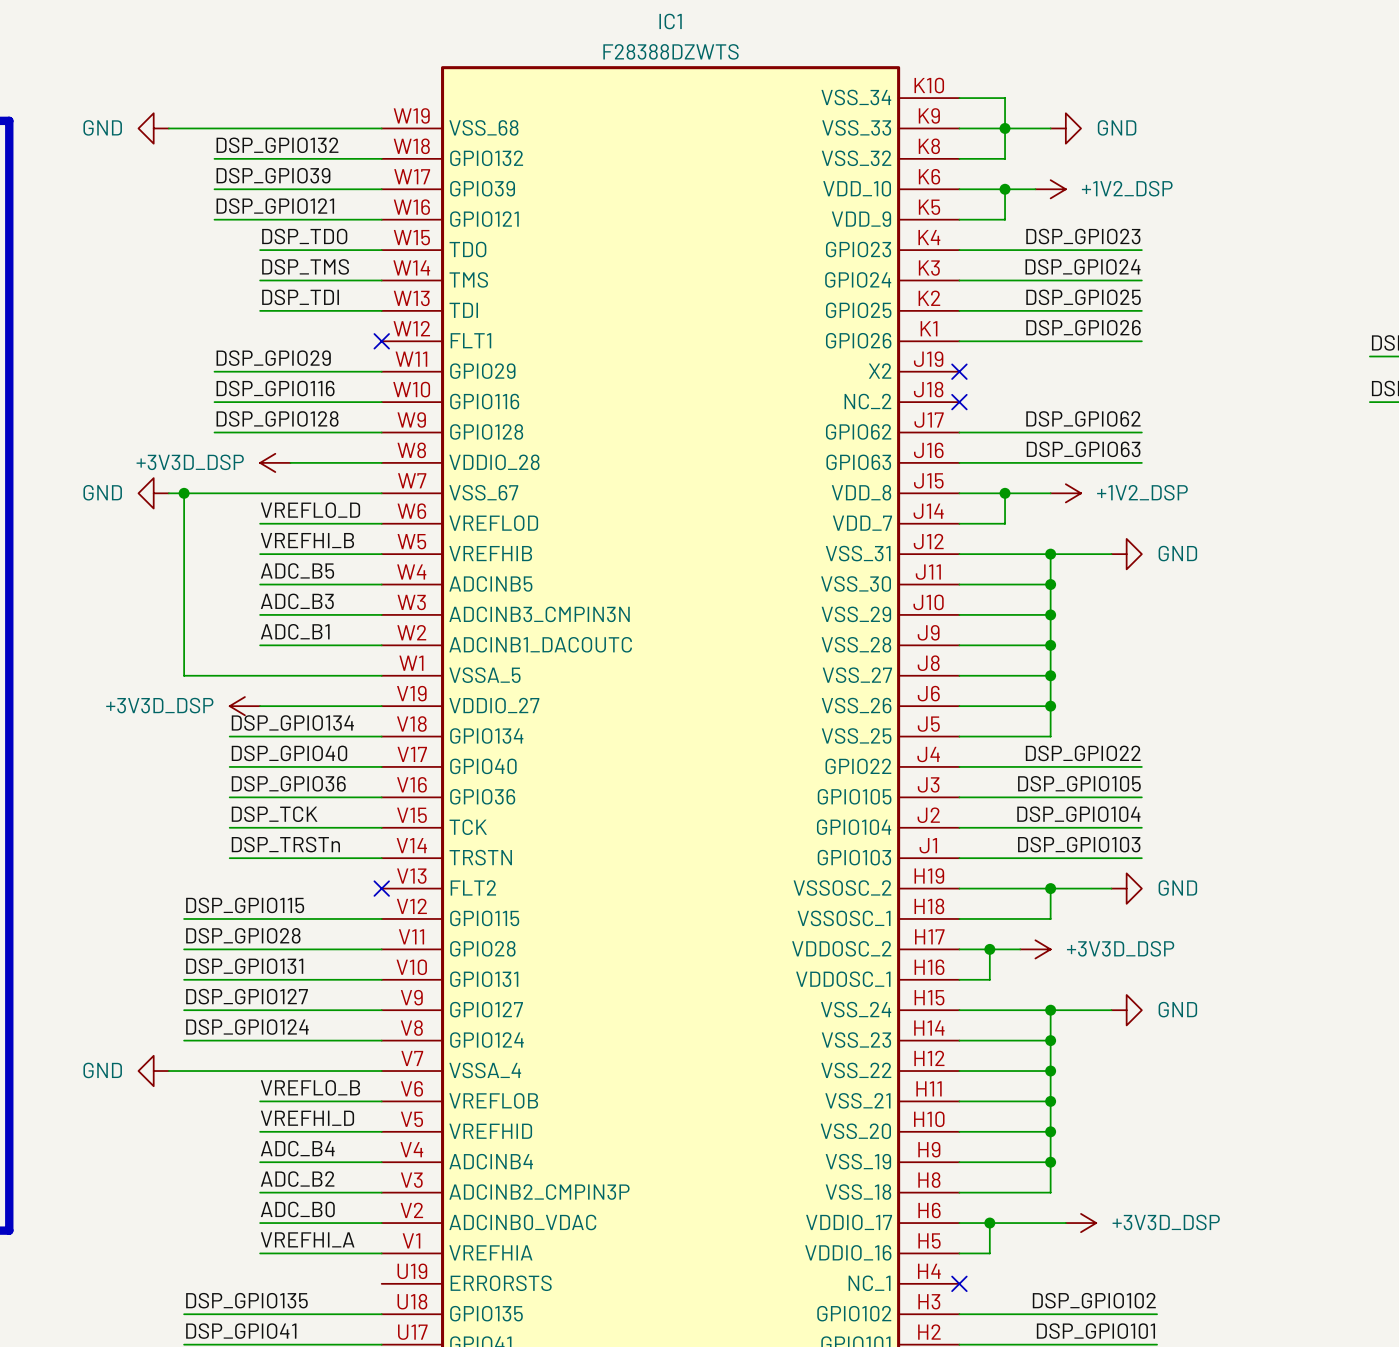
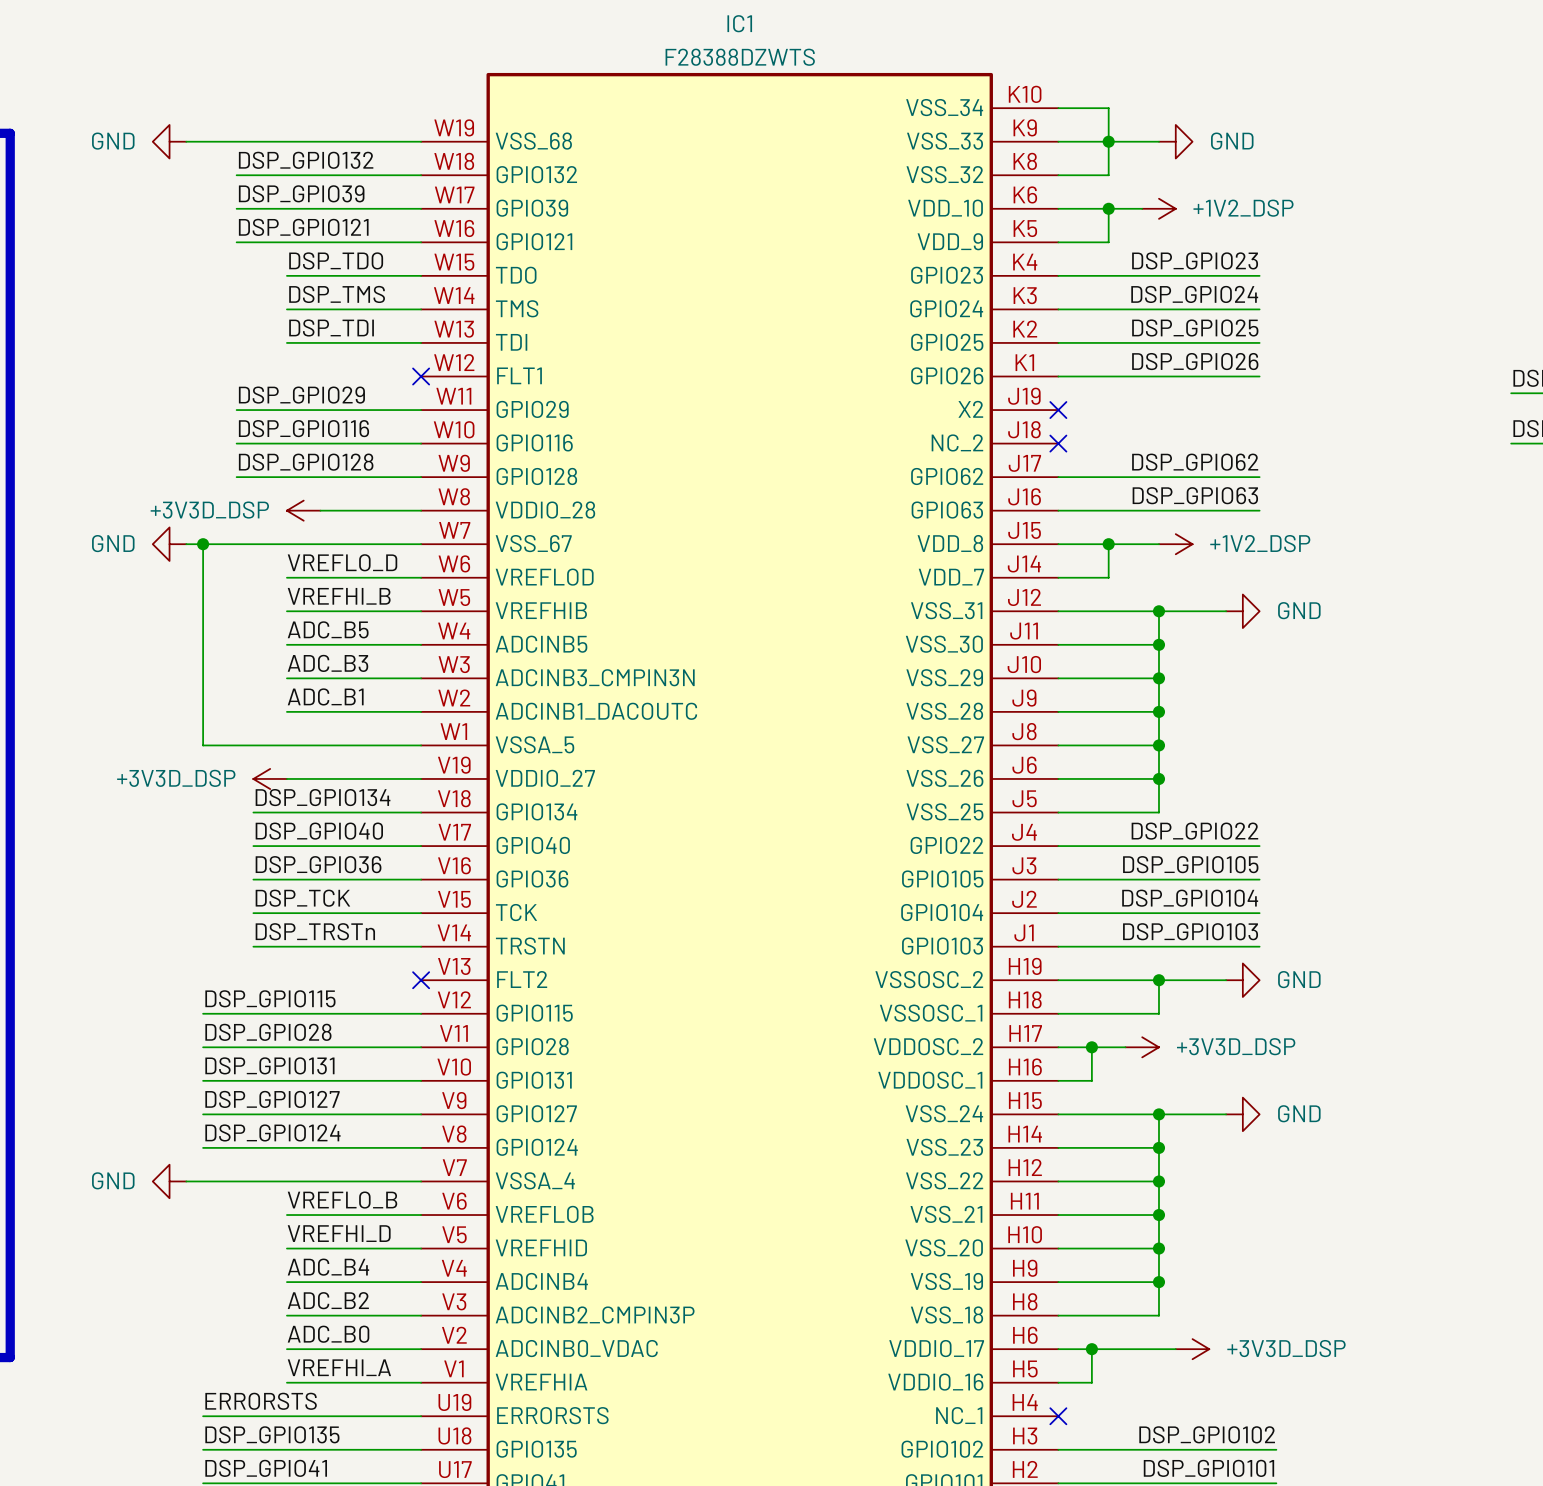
label: none -> ERRORSTS (261, 1401)
wire: none -> (203, 1416) (421, 1416)

